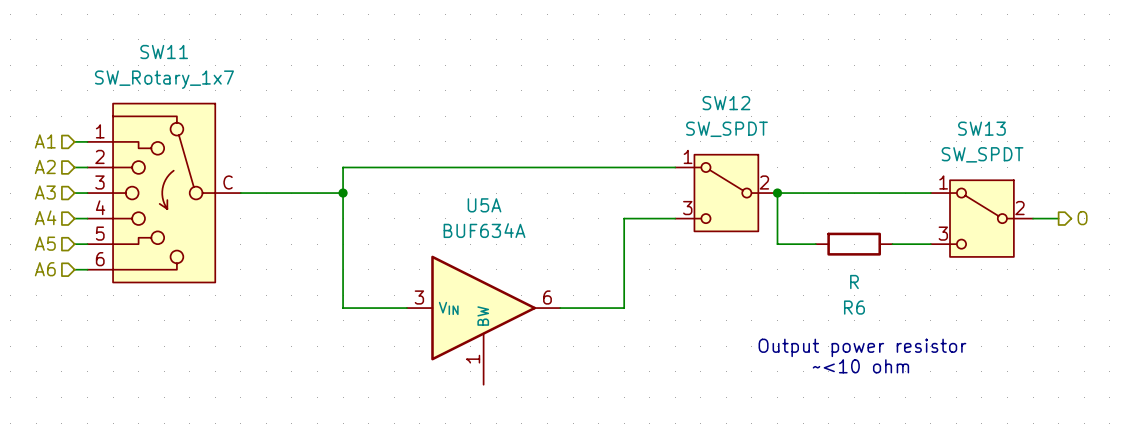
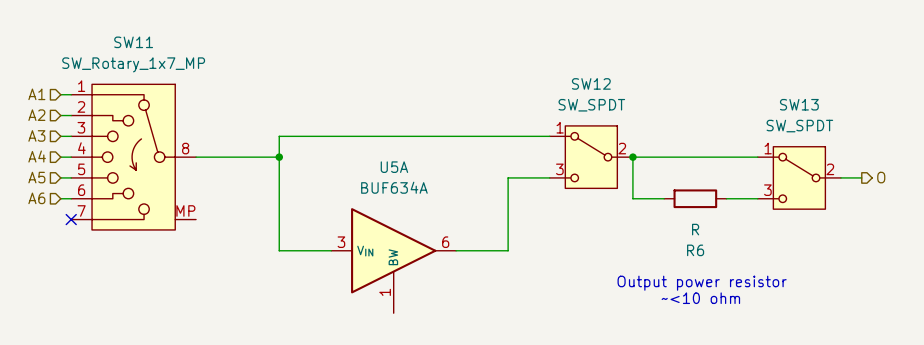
SW11 value: SW_Rotary_1x7 (164, 79) -> SW_Rotary_1x7_MP (133, 64)
SW11 symbol: [87, 103, 241, 283] -> [71, 84, 197, 230]
hierarchical label: none -> A1 (36, 94)
hierarchical label: A1 (45, 141) -> A2 (36, 115)
hierarchical label: A2 (45, 167) -> A3 (36, 135)
hierarchical label: A3 (45, 192) -> A4 (37, 156)
hierarchical label: A4 (45, 217) -> A5 (36, 177)
hierarchical label: A5 (45, 243) -> A6 (36, 198)
hierarchical label: A6 (45, 269) -> none
wire: (74, 269) (87, 269) -> (60, 94) (71, 94)
no-connect mark: none -> (71, 219)

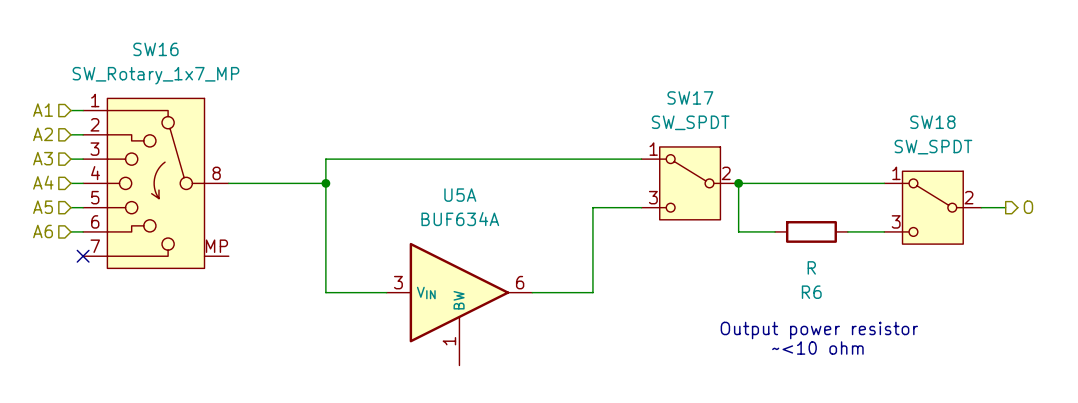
SW11 name: SW11 (133, 42) -> SW16 (155, 49)
SW12 name: SW12 (591, 83) -> SW17 (690, 97)
SW13 name: SW13 (799, 104) -> SW18 (932, 122)

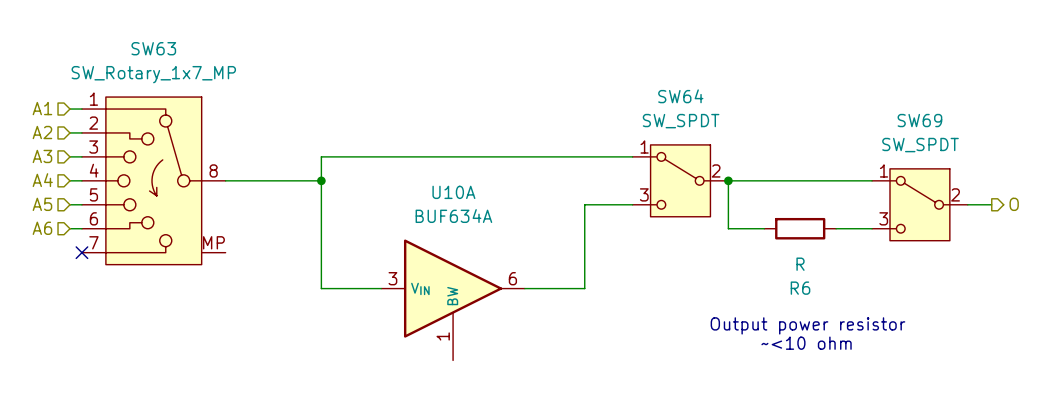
SW16 name: SW16 (155, 49) -> SW63 (153, 48)
SW17 name: SW17 (690, 97) -> SW64 (680, 96)
SW18 name: SW18 (932, 122) -> SW69 (919, 120)
U5A name: U5A (460, 195) -> U10A (453, 192)

